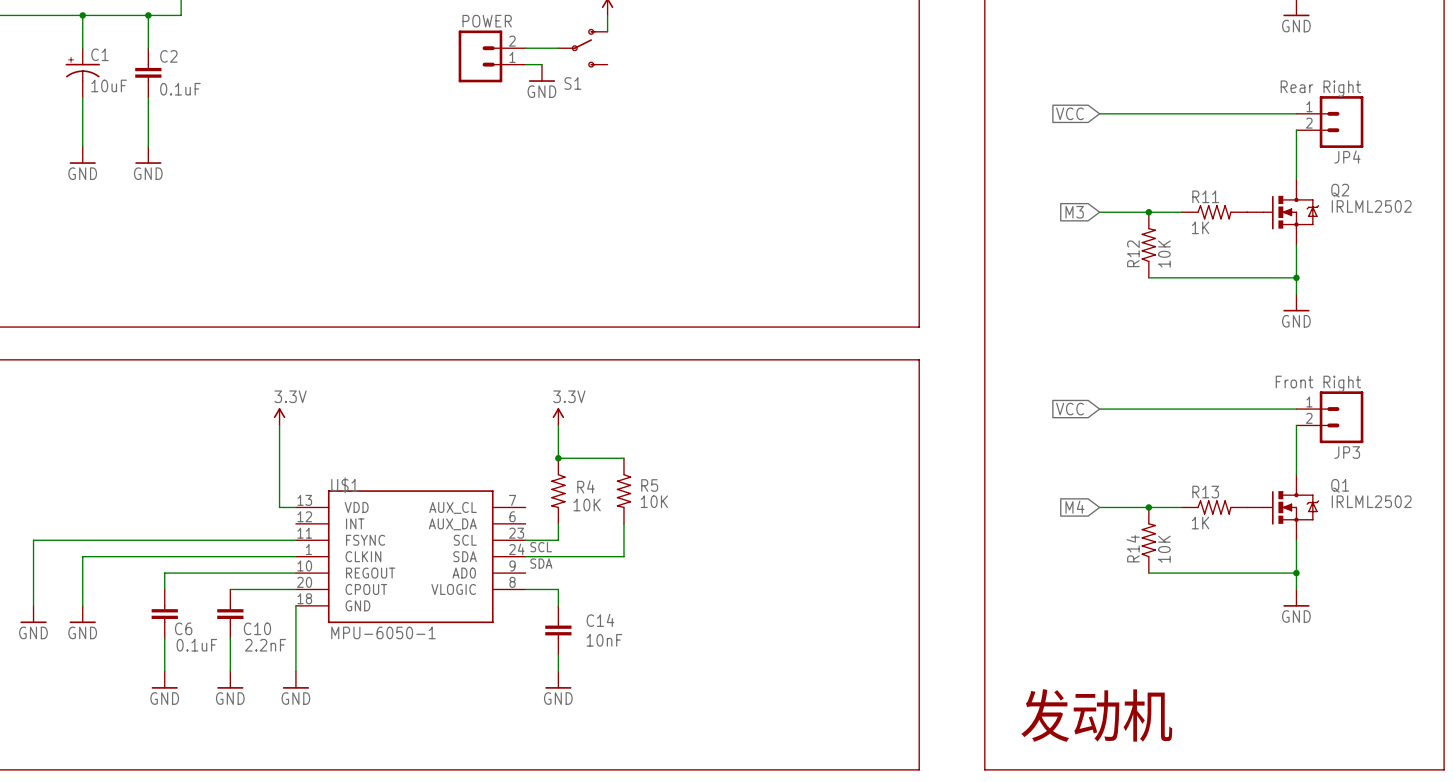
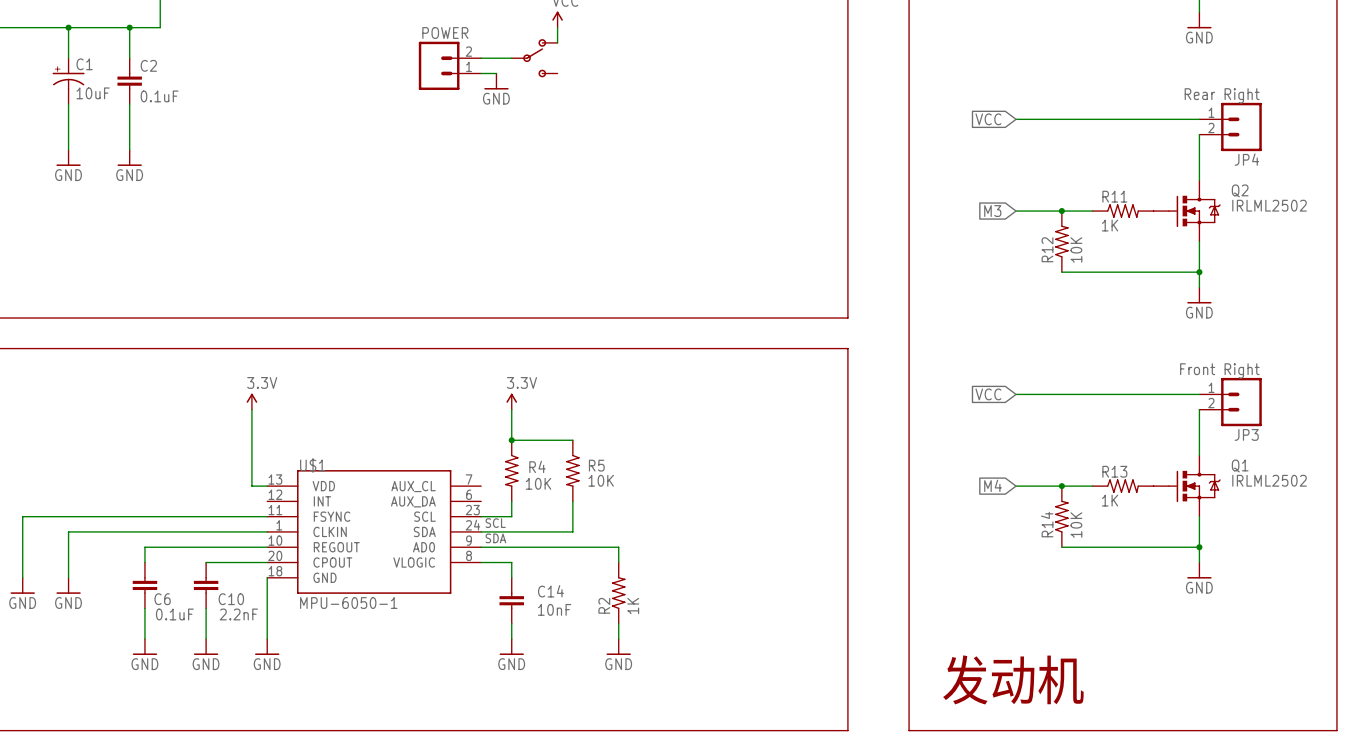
S1: (582, 48) -> none
part: none -> (534, 58)
wire: none -> (481, 547) (618, 547) (618, 562)
R2: none -> 1K (618, 593)
wire: none -> (618, 623) (618, 638)
power symbol: none -> GND (618, 646)

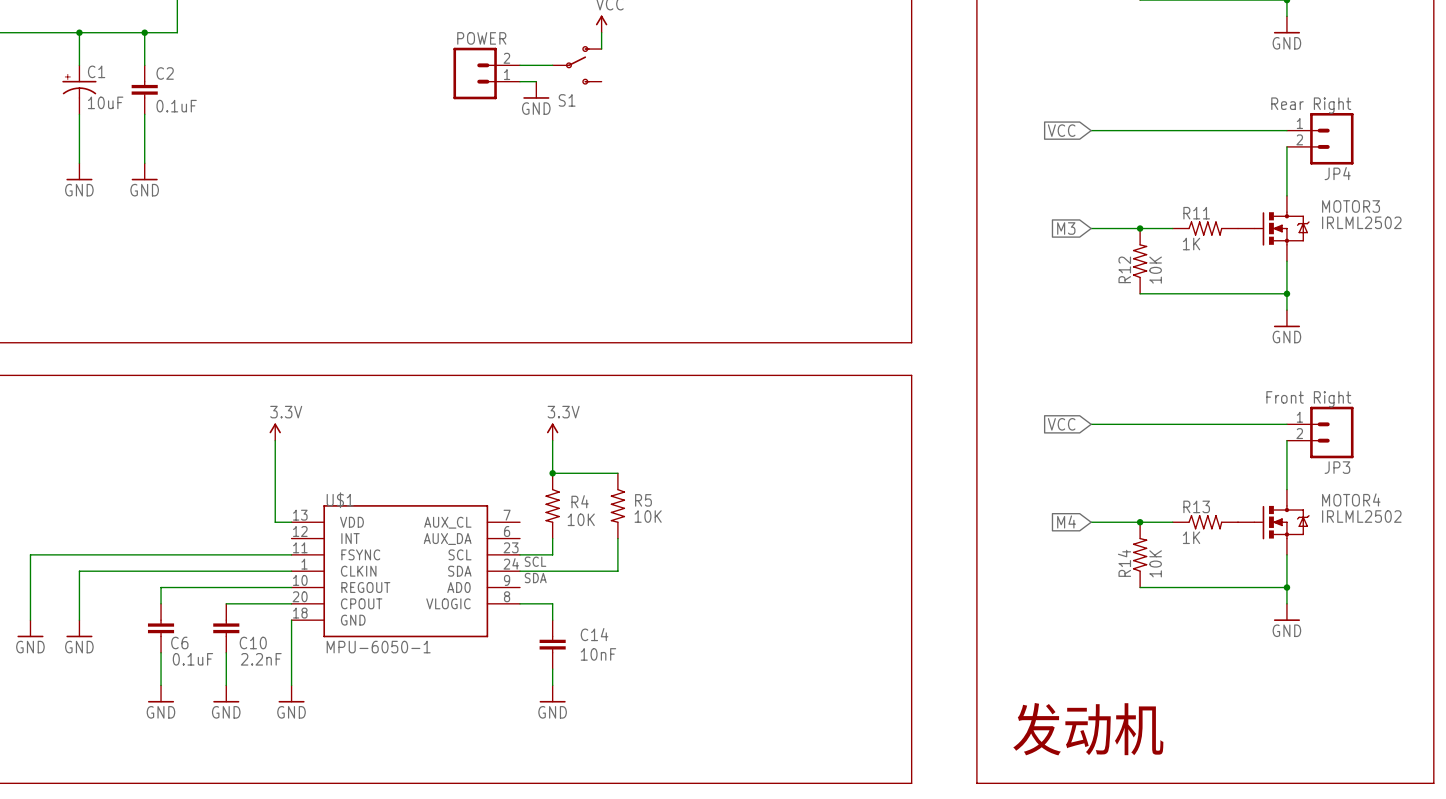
part: (534, 58) -> none
S1: none -> (577, 65)
Q2 name: Q2 (1240, 190) -> MOTOR3 (1351, 206)
Q1 name: Q1 (1240, 465) -> MOTOR4 (1351, 499)
wire: (481, 547) (618, 547) (618, 562) -> none
R2: 1K (618, 593) -> none
wire: (618, 623) (618, 638) -> none
power symbol: GND (618, 646) -> none

